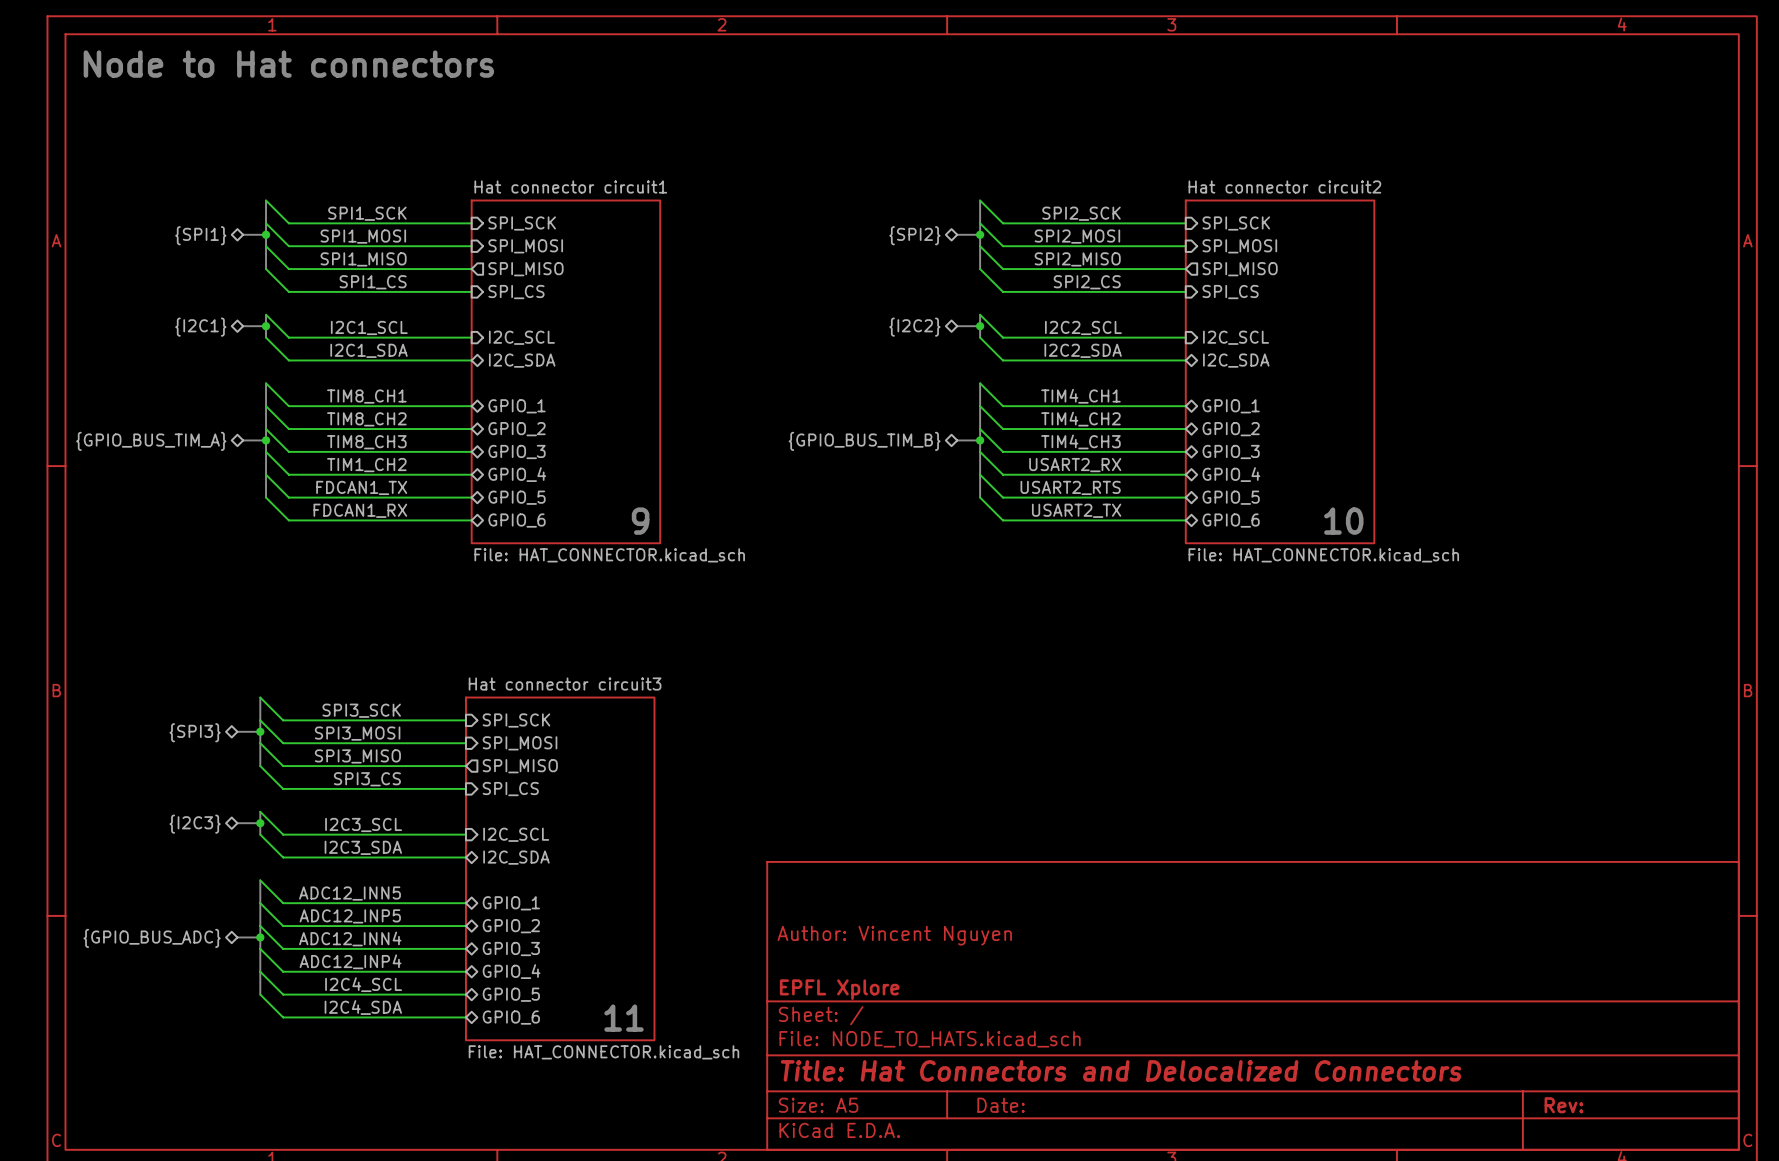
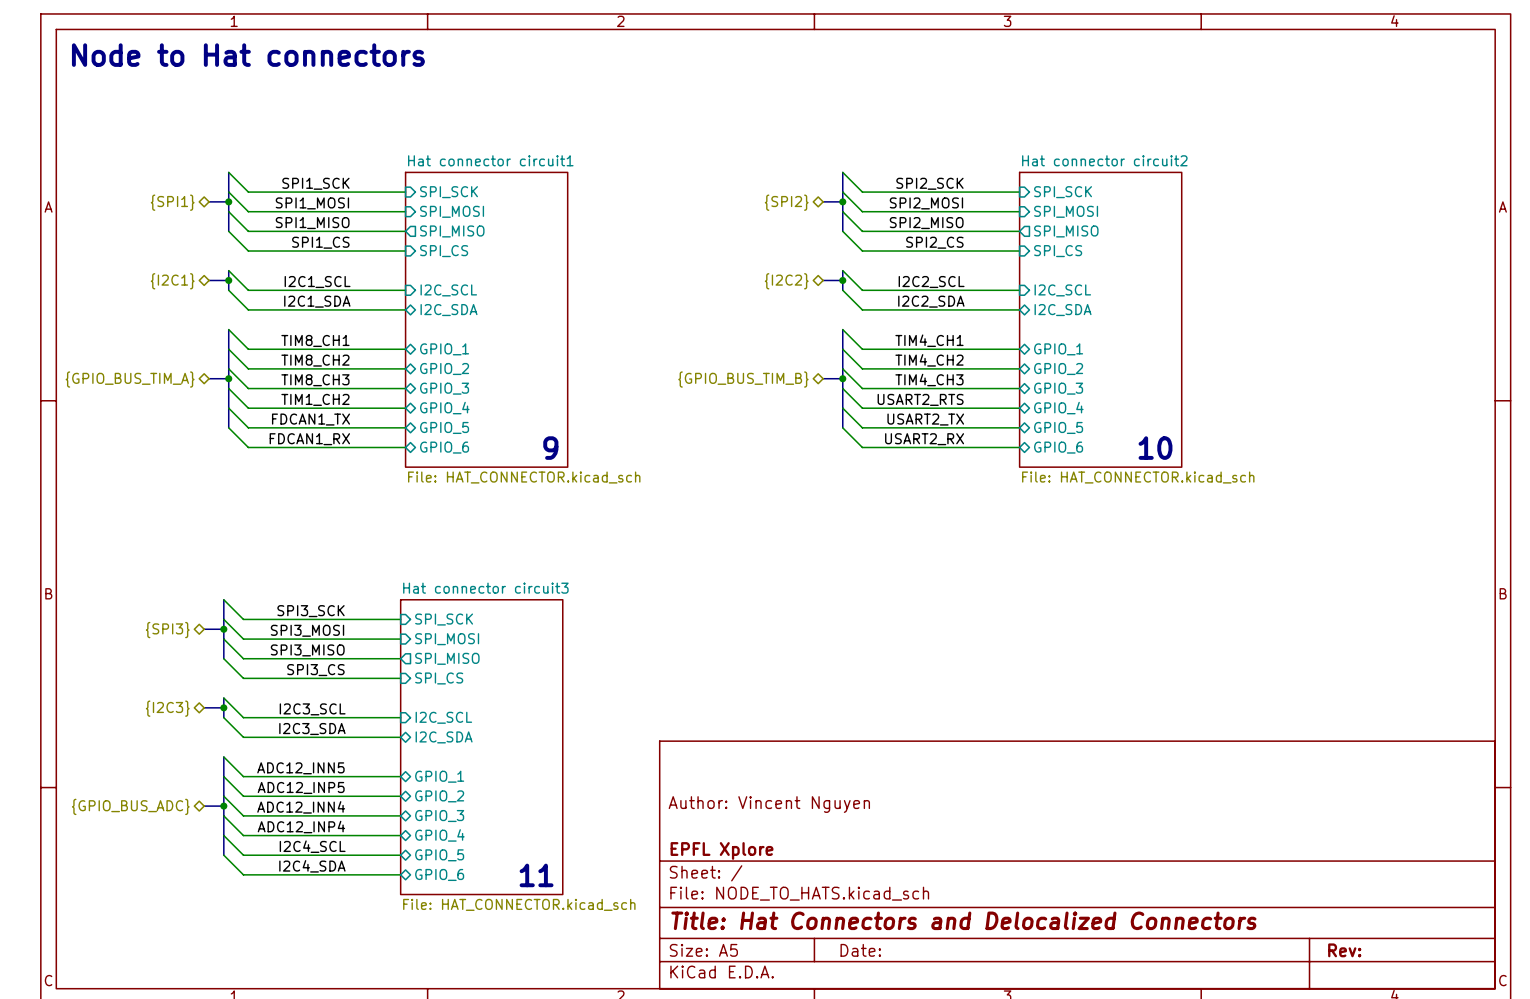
label: USART2_RX (1075, 465) -> USART2_RTS (920, 399)
label: USART2_RTS (1070, 487) -> USART2_TX (925, 419)
label: USART2_TX (1076, 510) -> USART2_RX (924, 439)

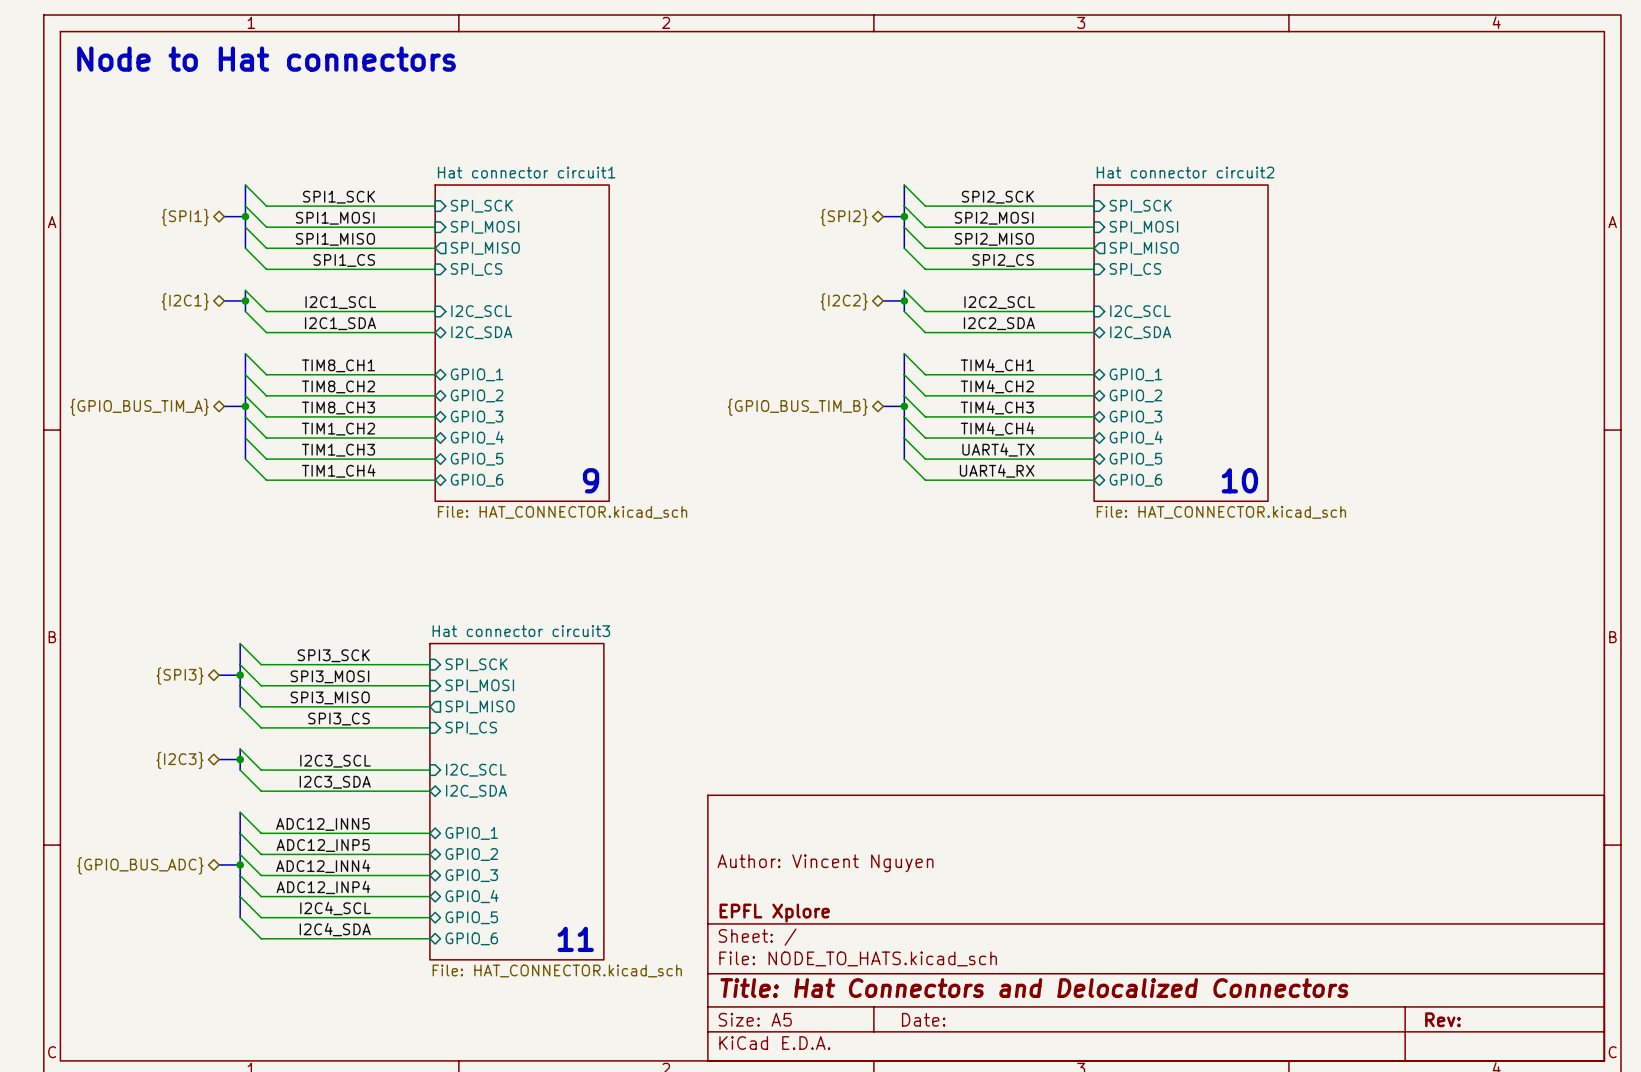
label: USART2_RTS (920, 399) -> TIM4_CH4 (997, 428)
label: FDCAN1_TX (311, 419) -> TIM1_CH3 (338, 450)
label: USART2_TX (925, 419) -> UART4_TX (998, 449)
label: FDCAN1_RX (309, 439) -> TIM1_CH4 (338, 471)
label: USART2_RX (924, 439) -> UART4_RX (997, 471)

